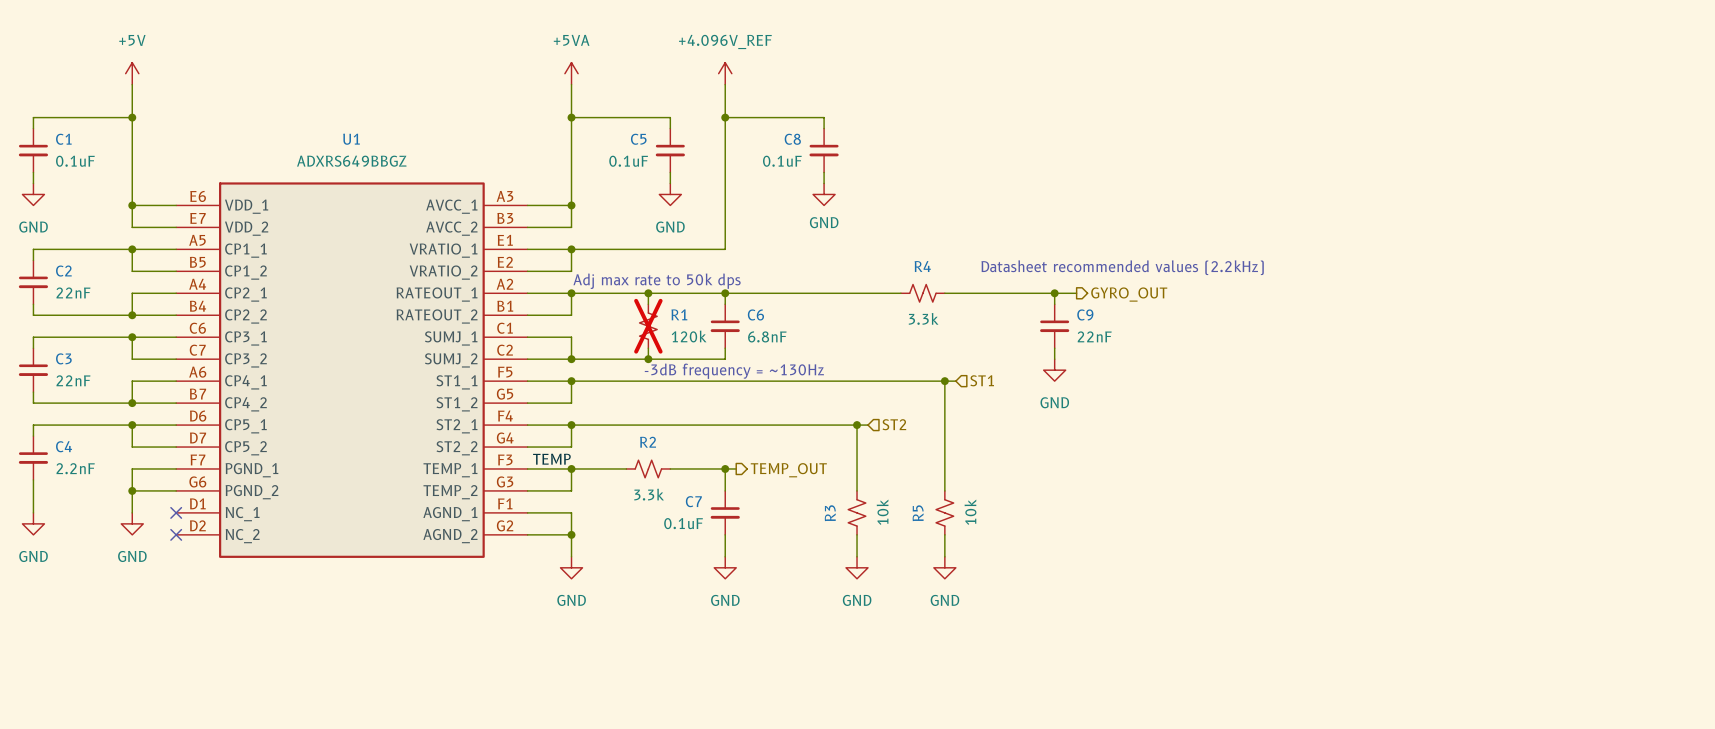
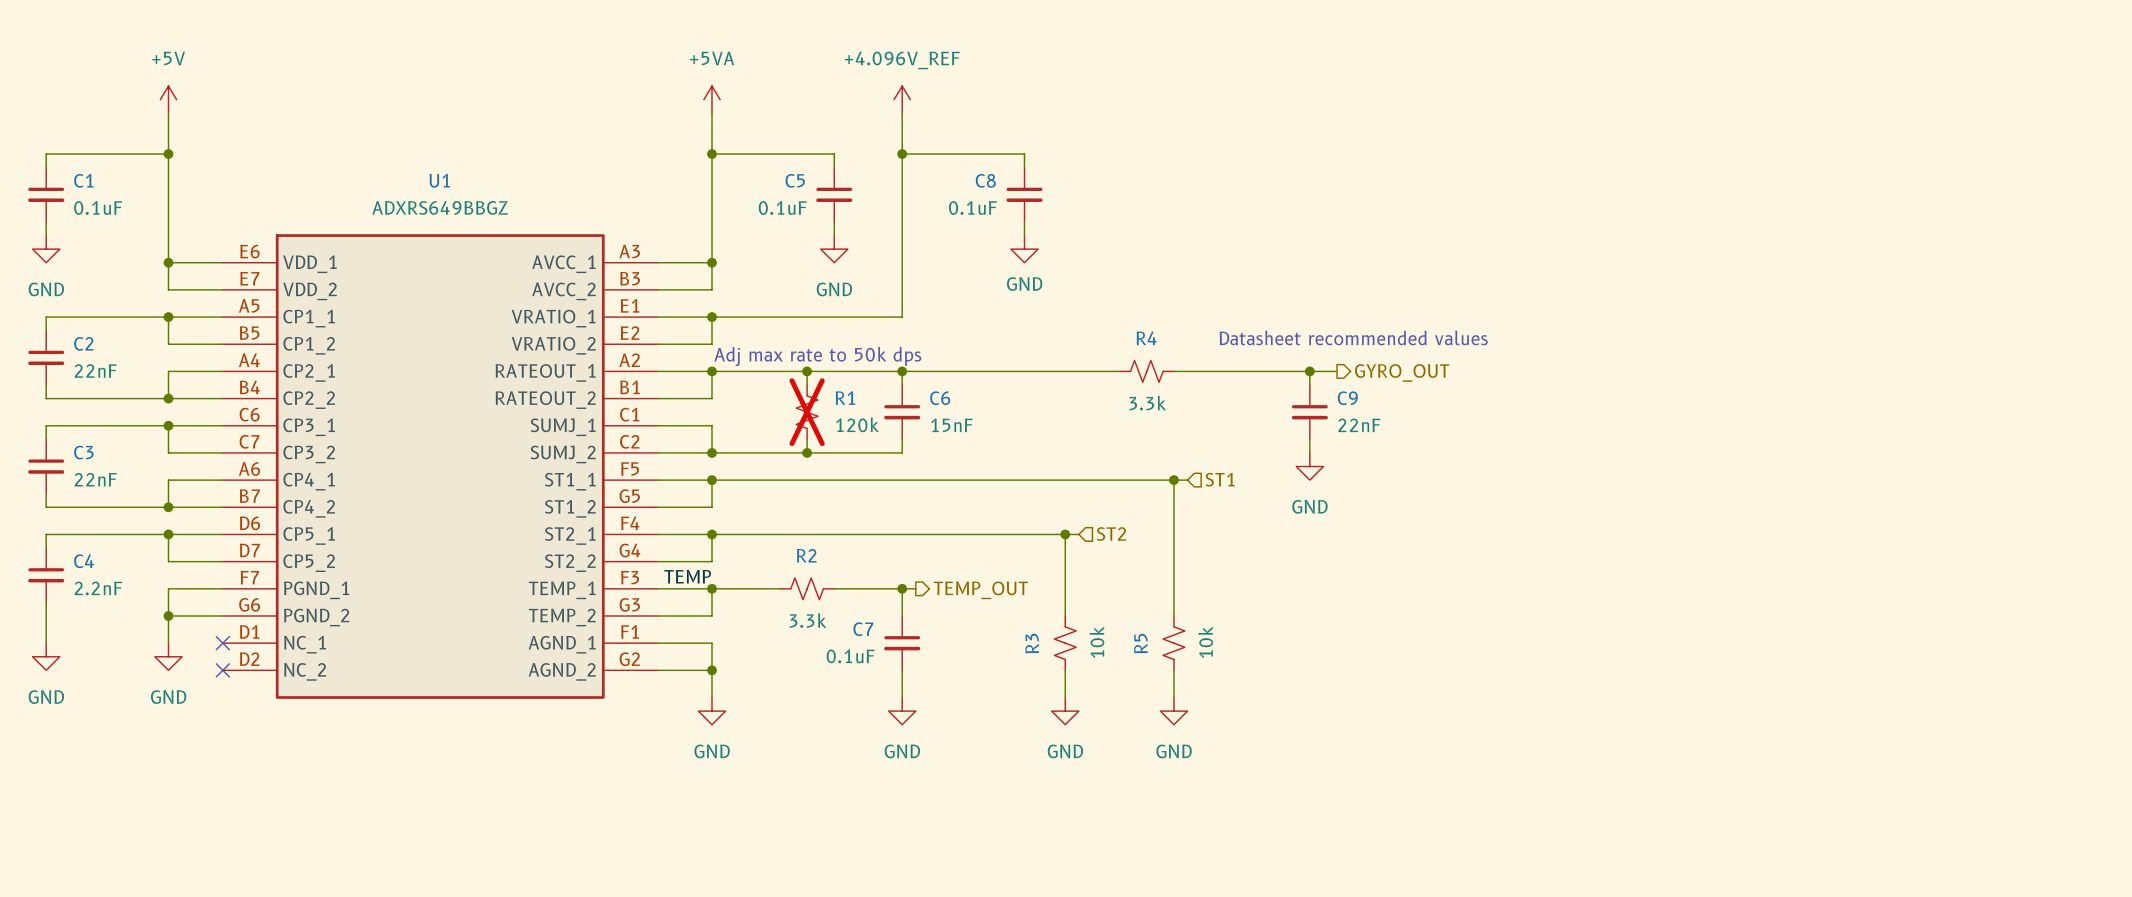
text: Datasheet recommended values (2.2kHz) (1122, 267) -> Datasheet recommended values (1353, 337)
C6 value: 6.8nF (767, 336) -> 15nF (951, 425)
text: -3dB frequency = ~130Hz (734, 371) -> none

